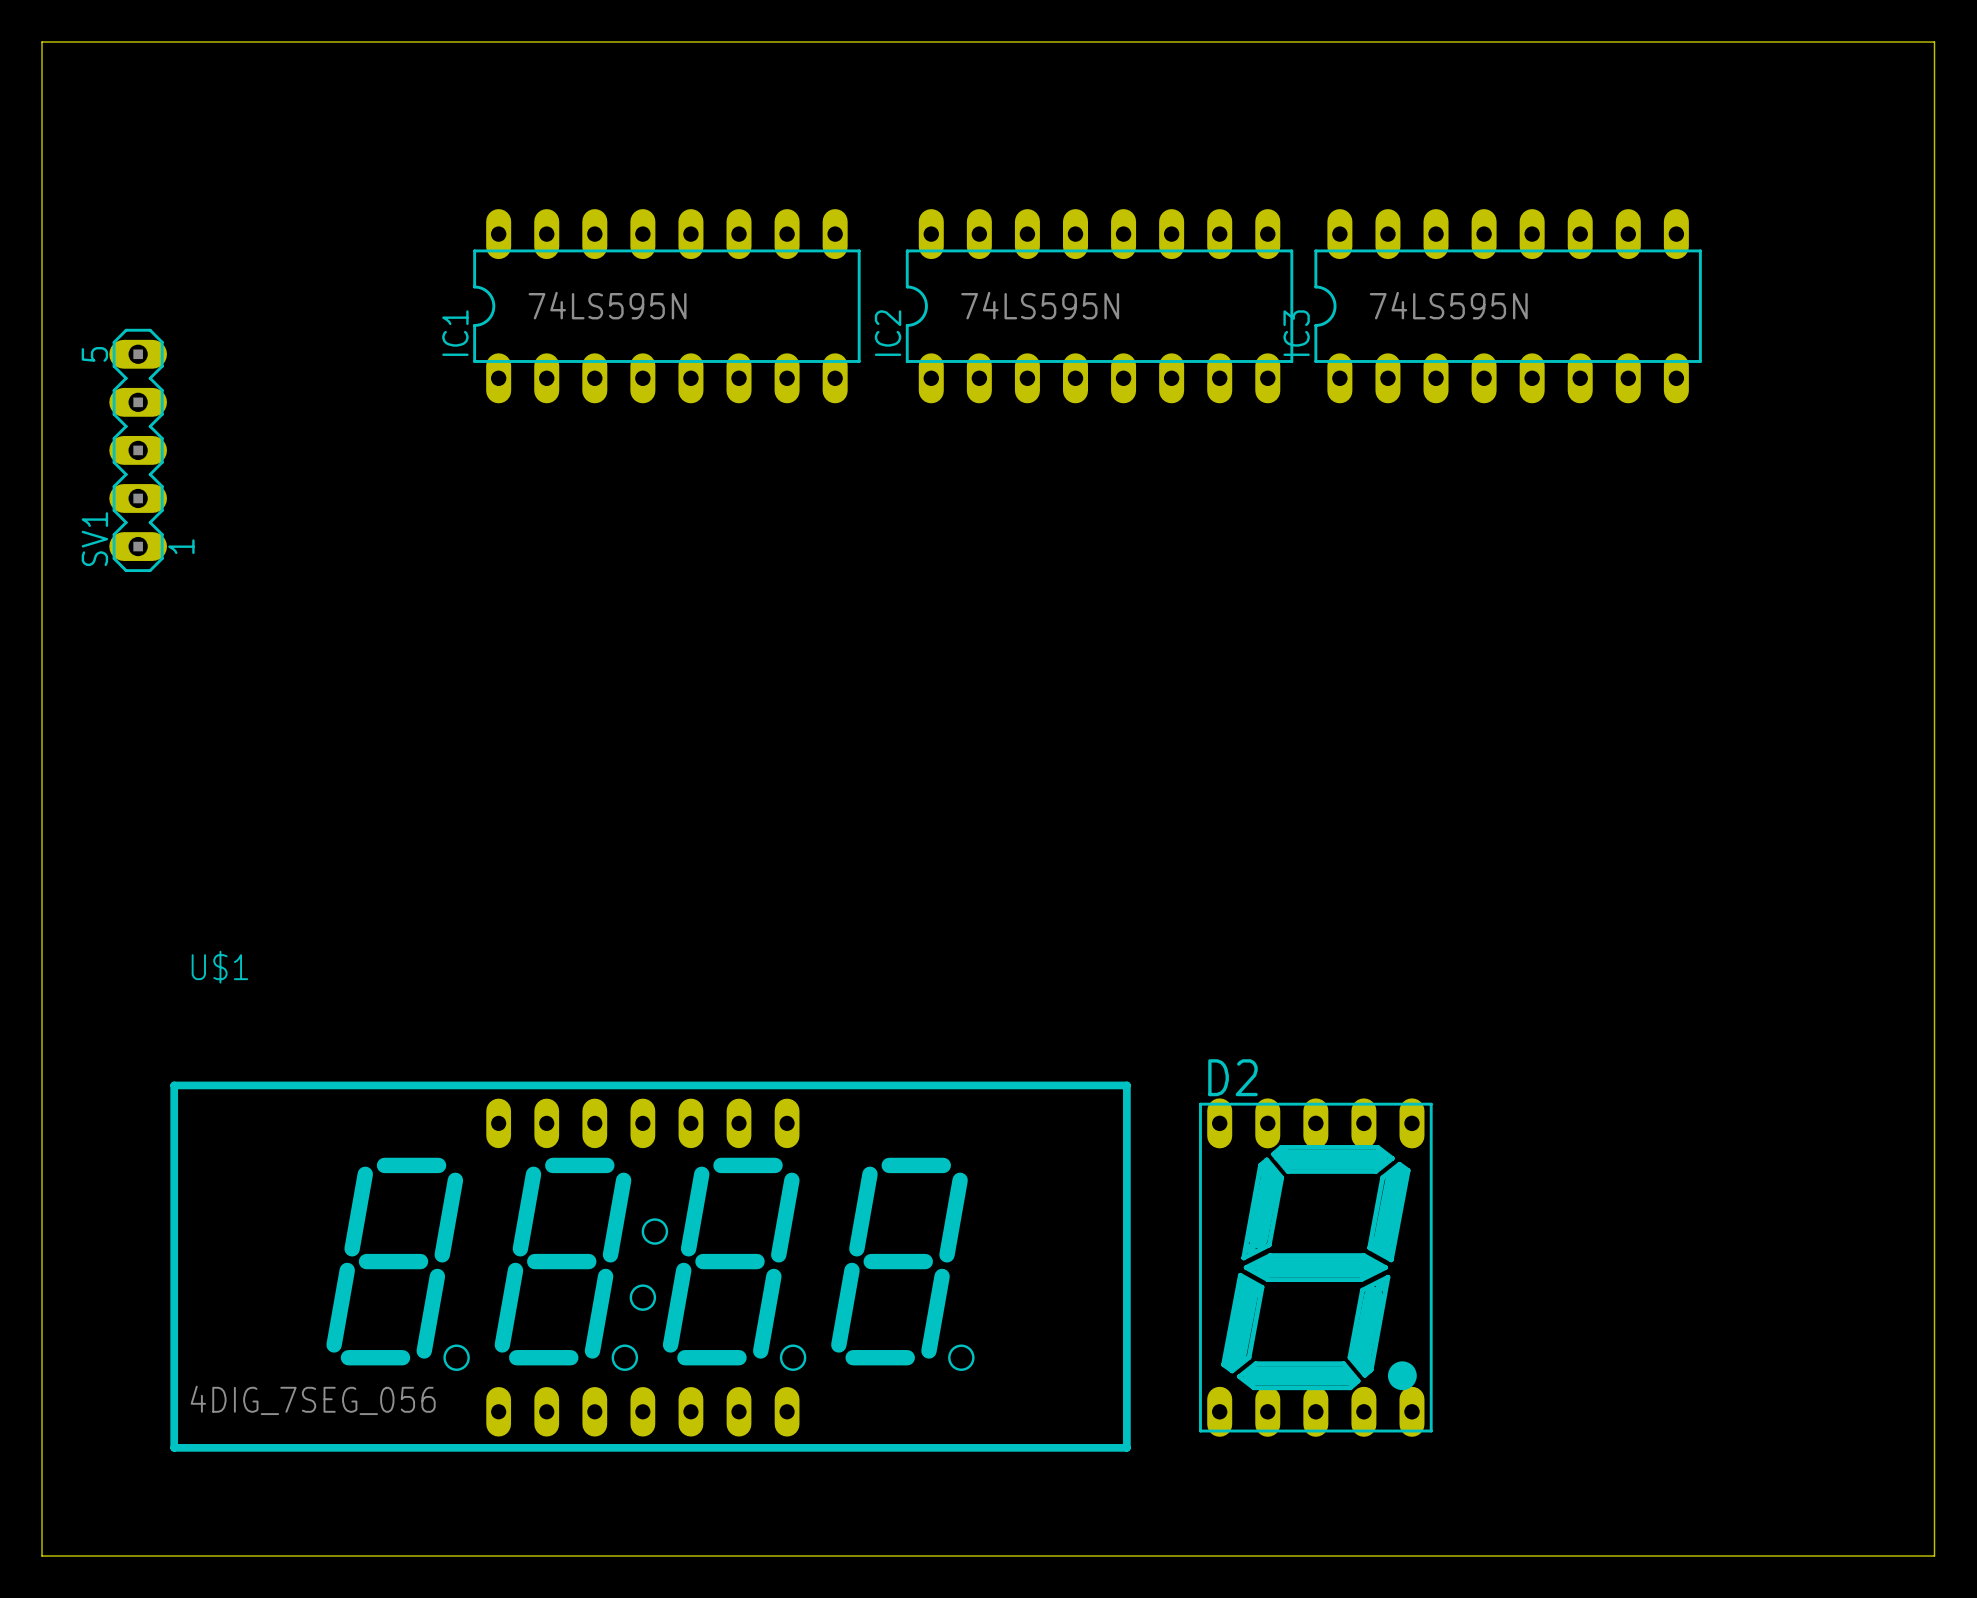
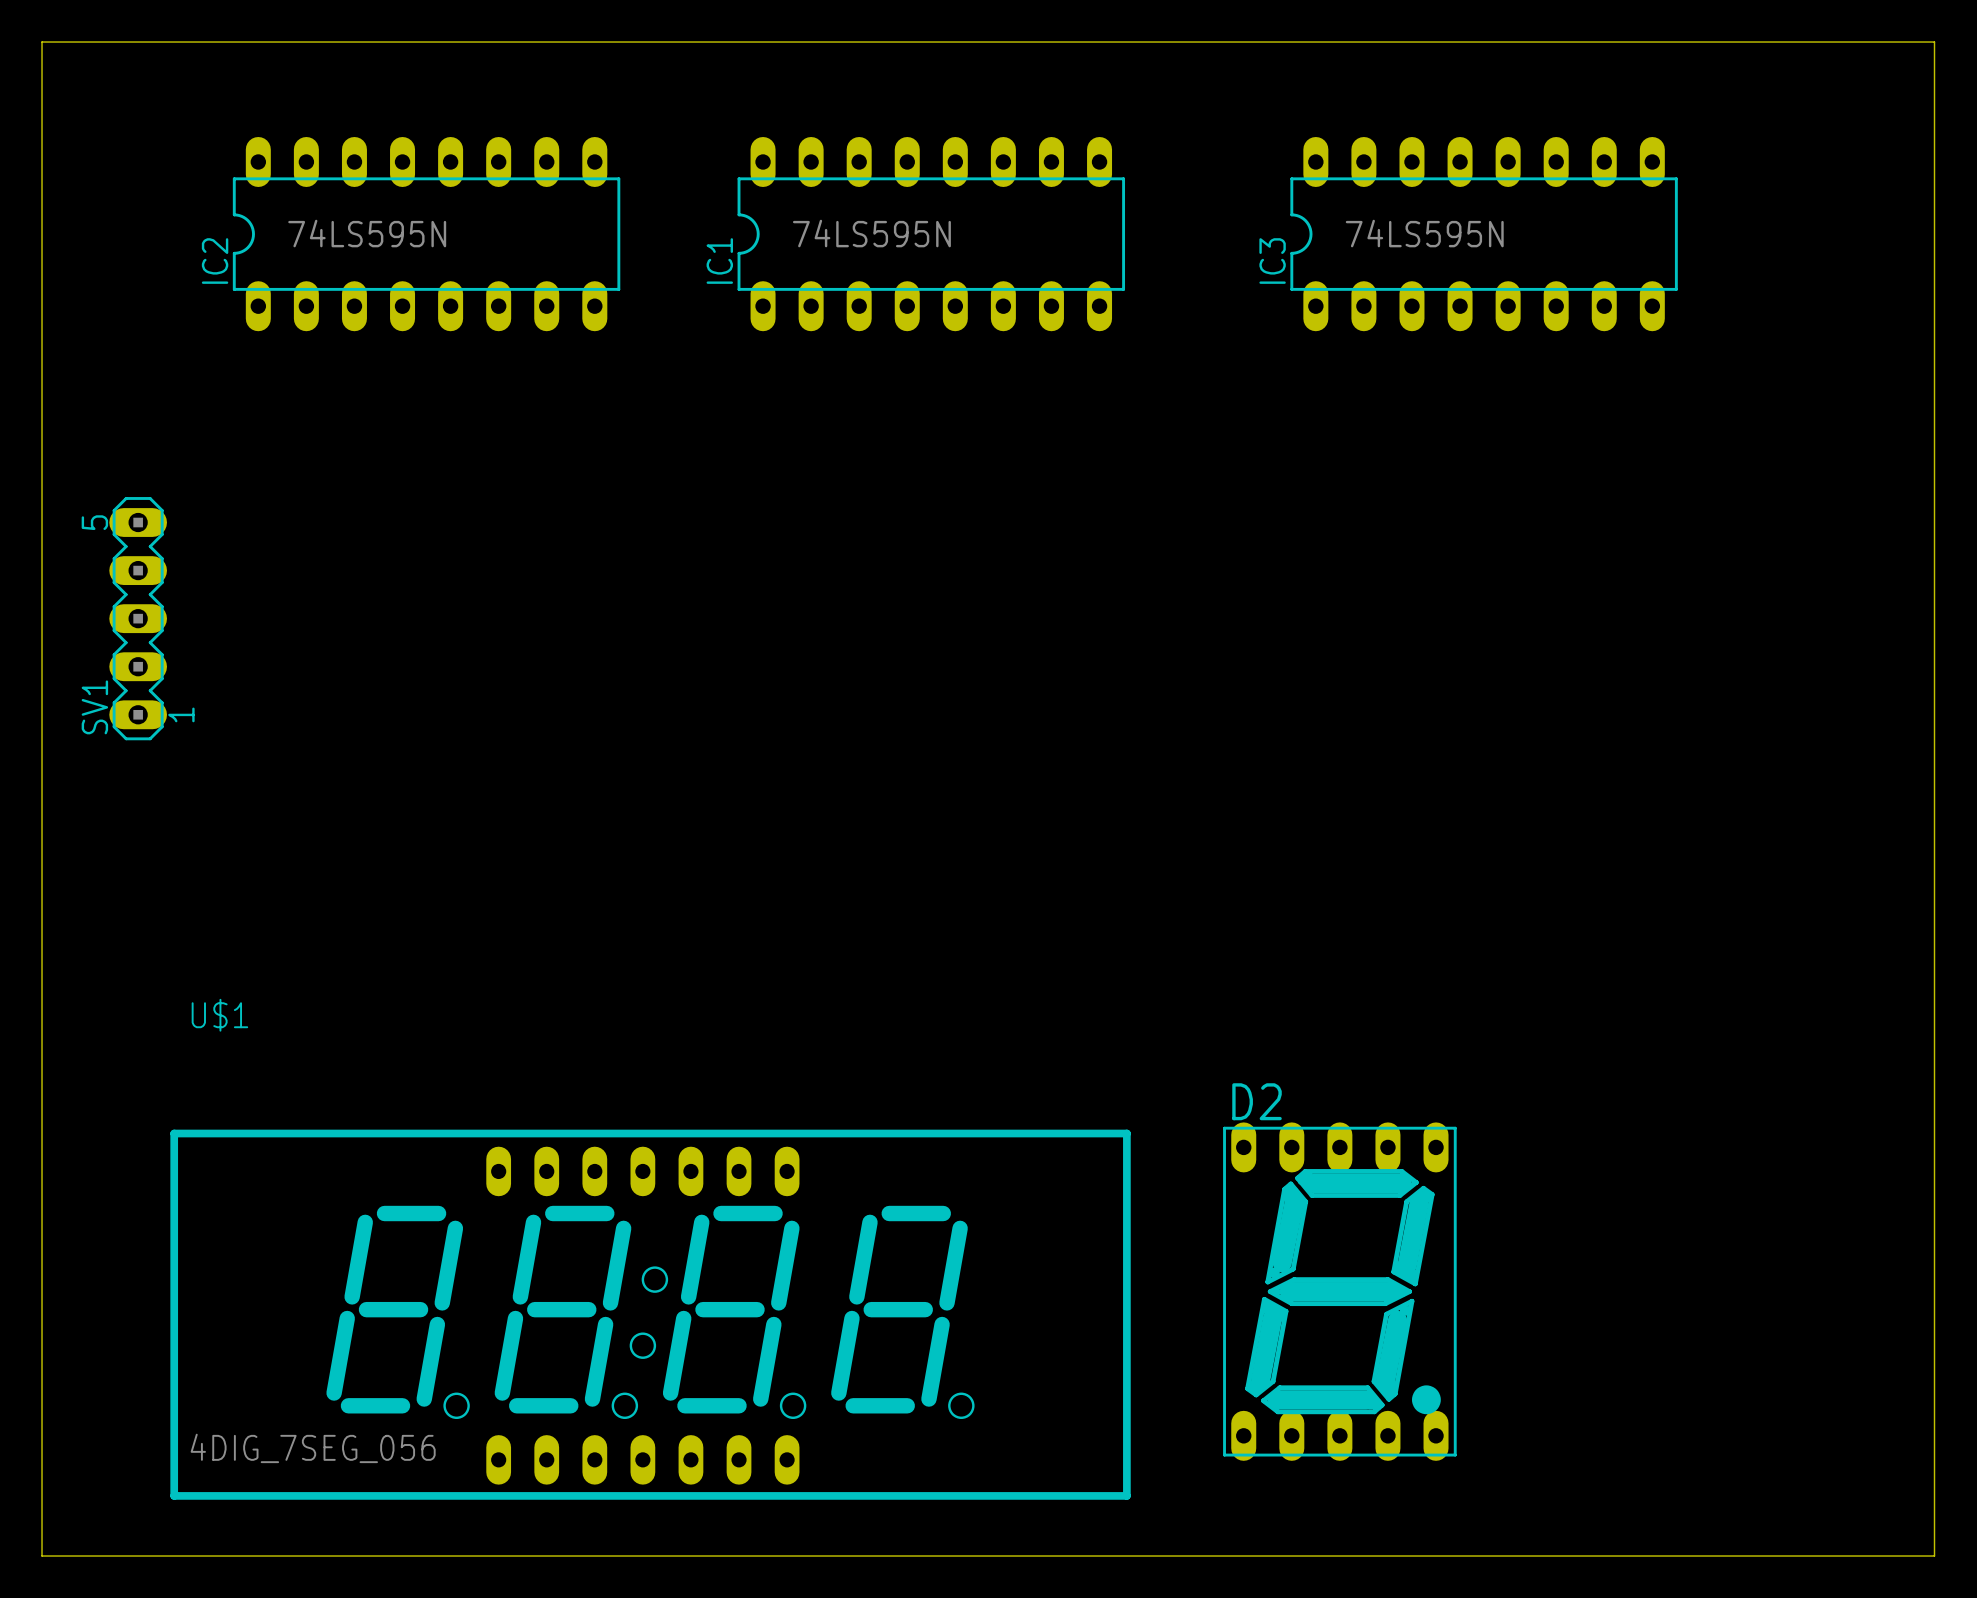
IC1 position: (666, 306) -> (931, 234)
IC2 position: (1099, 306) -> (426, 234)
IC3 position: (1508, 306) -> (1484, 234)
SV1 position: (138, 450) -> (138, 618)
U$1 position: (650, 1266) -> (650, 1314)
D2 position: (1315, 1267) -> (1339, 1291)

